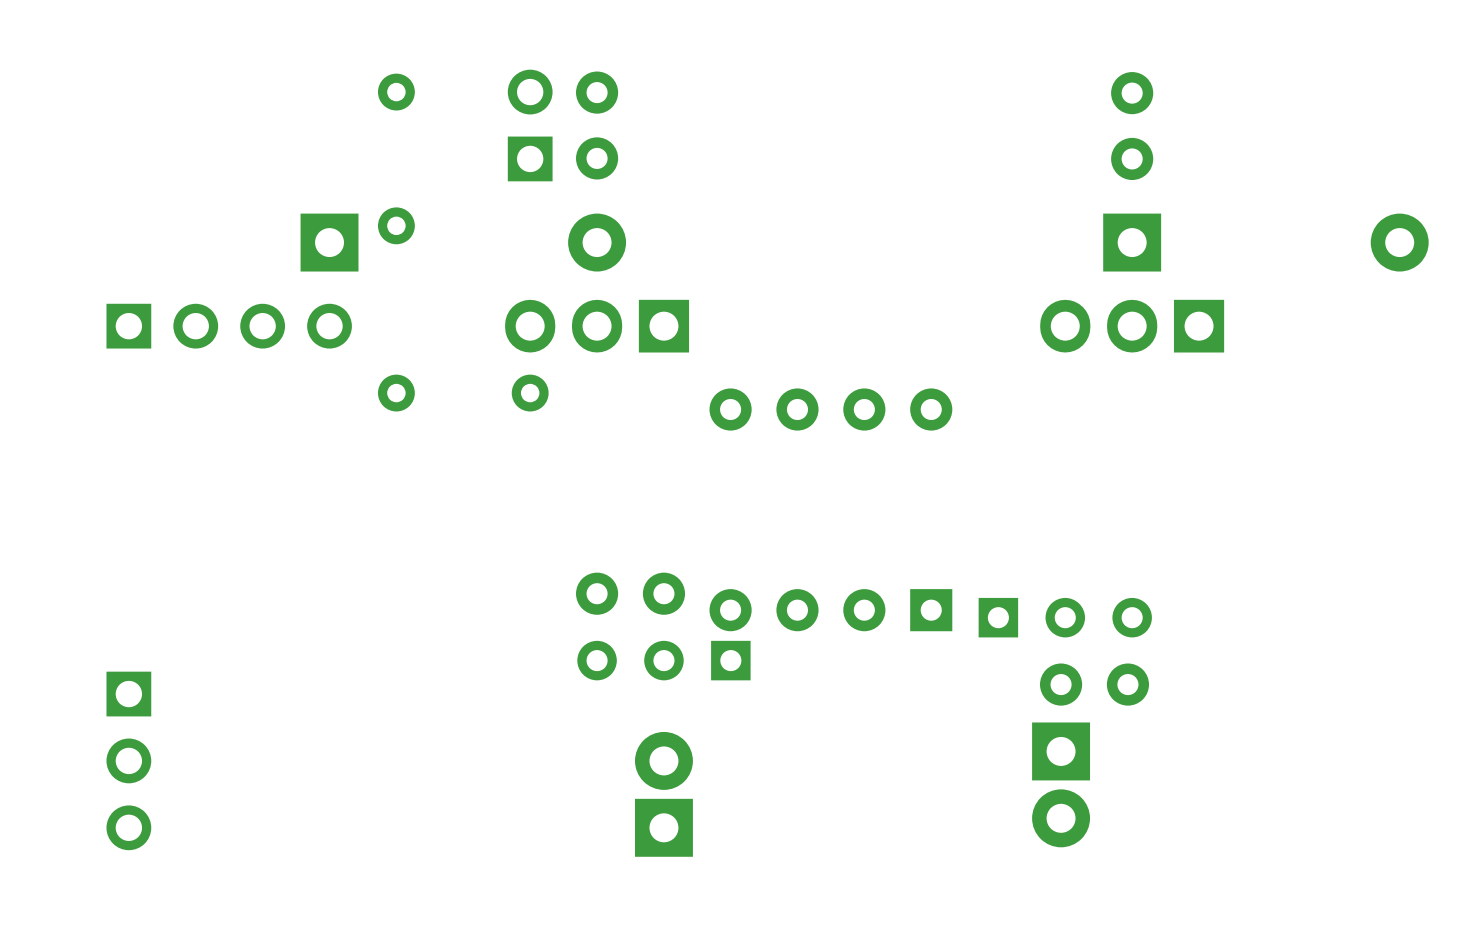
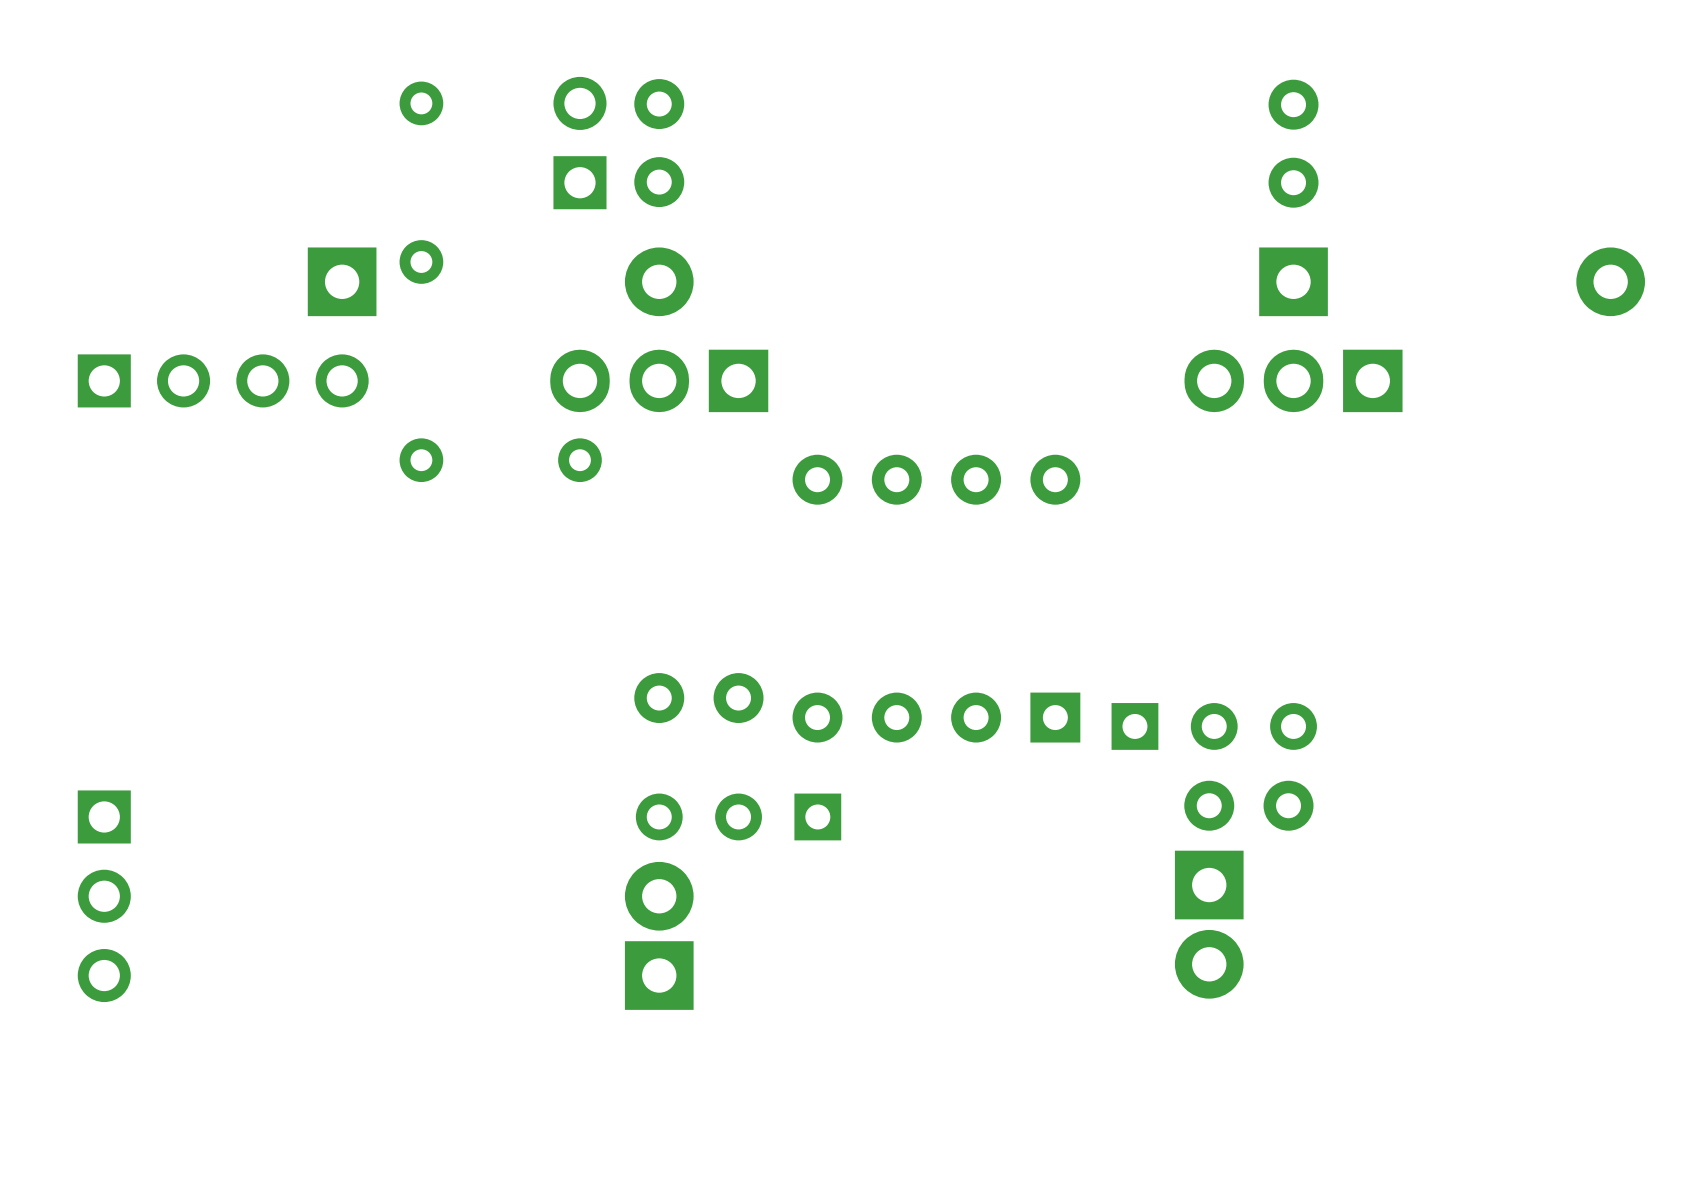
part position: (663, 660) -> (738, 816)
part position: (663, 794) -> (659, 935)

